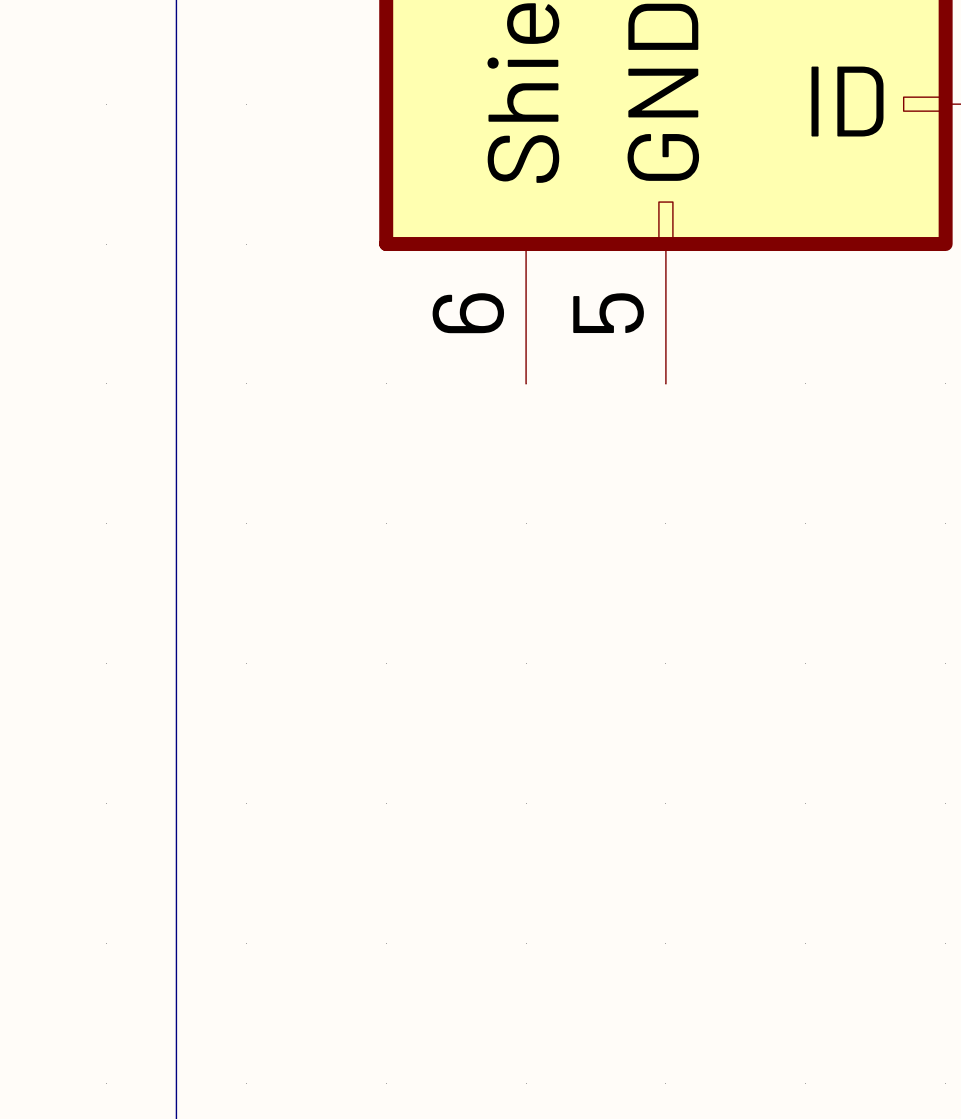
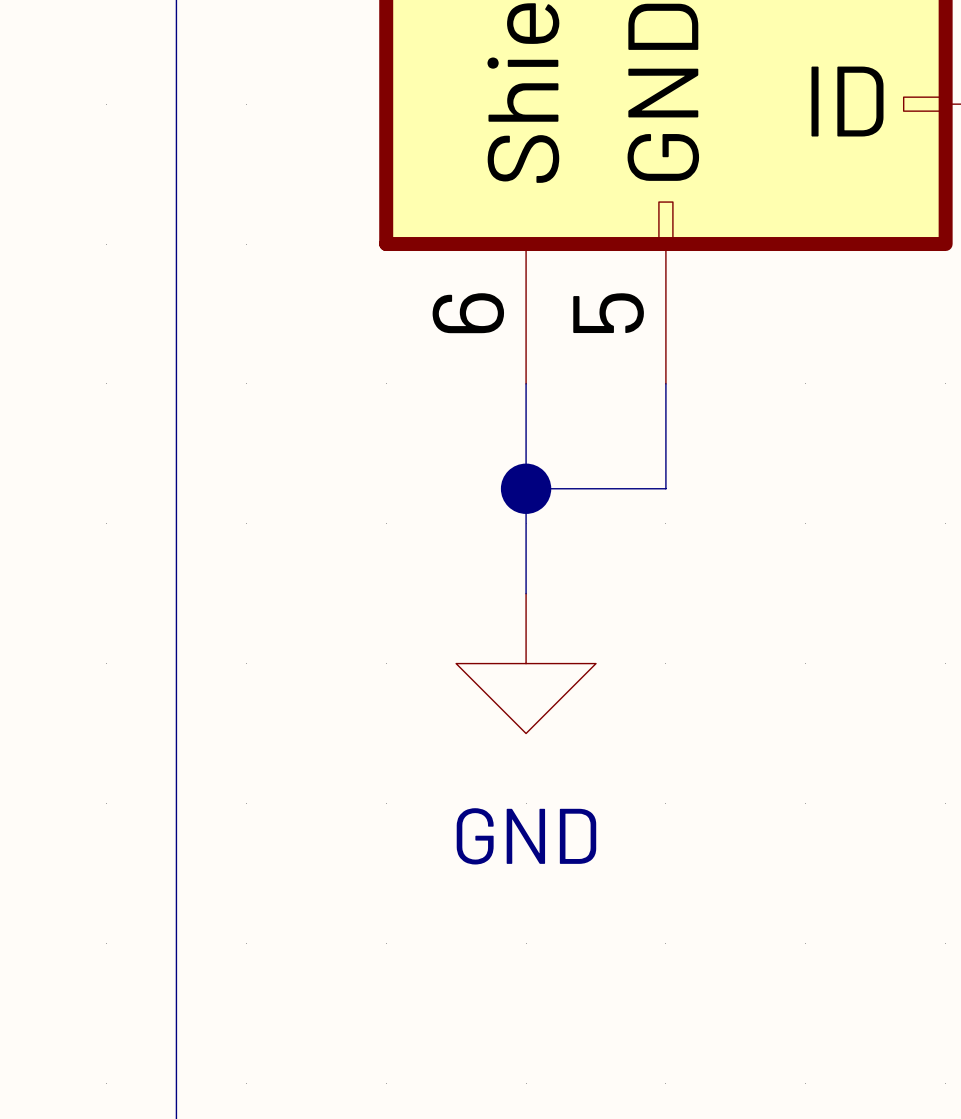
wire: none -> (526, 383) (526, 593)
wire: none -> (665, 383) (665, 488) (526, 488)
junction: none -> (526, 488)
power symbol: none -> GND (526, 663)

